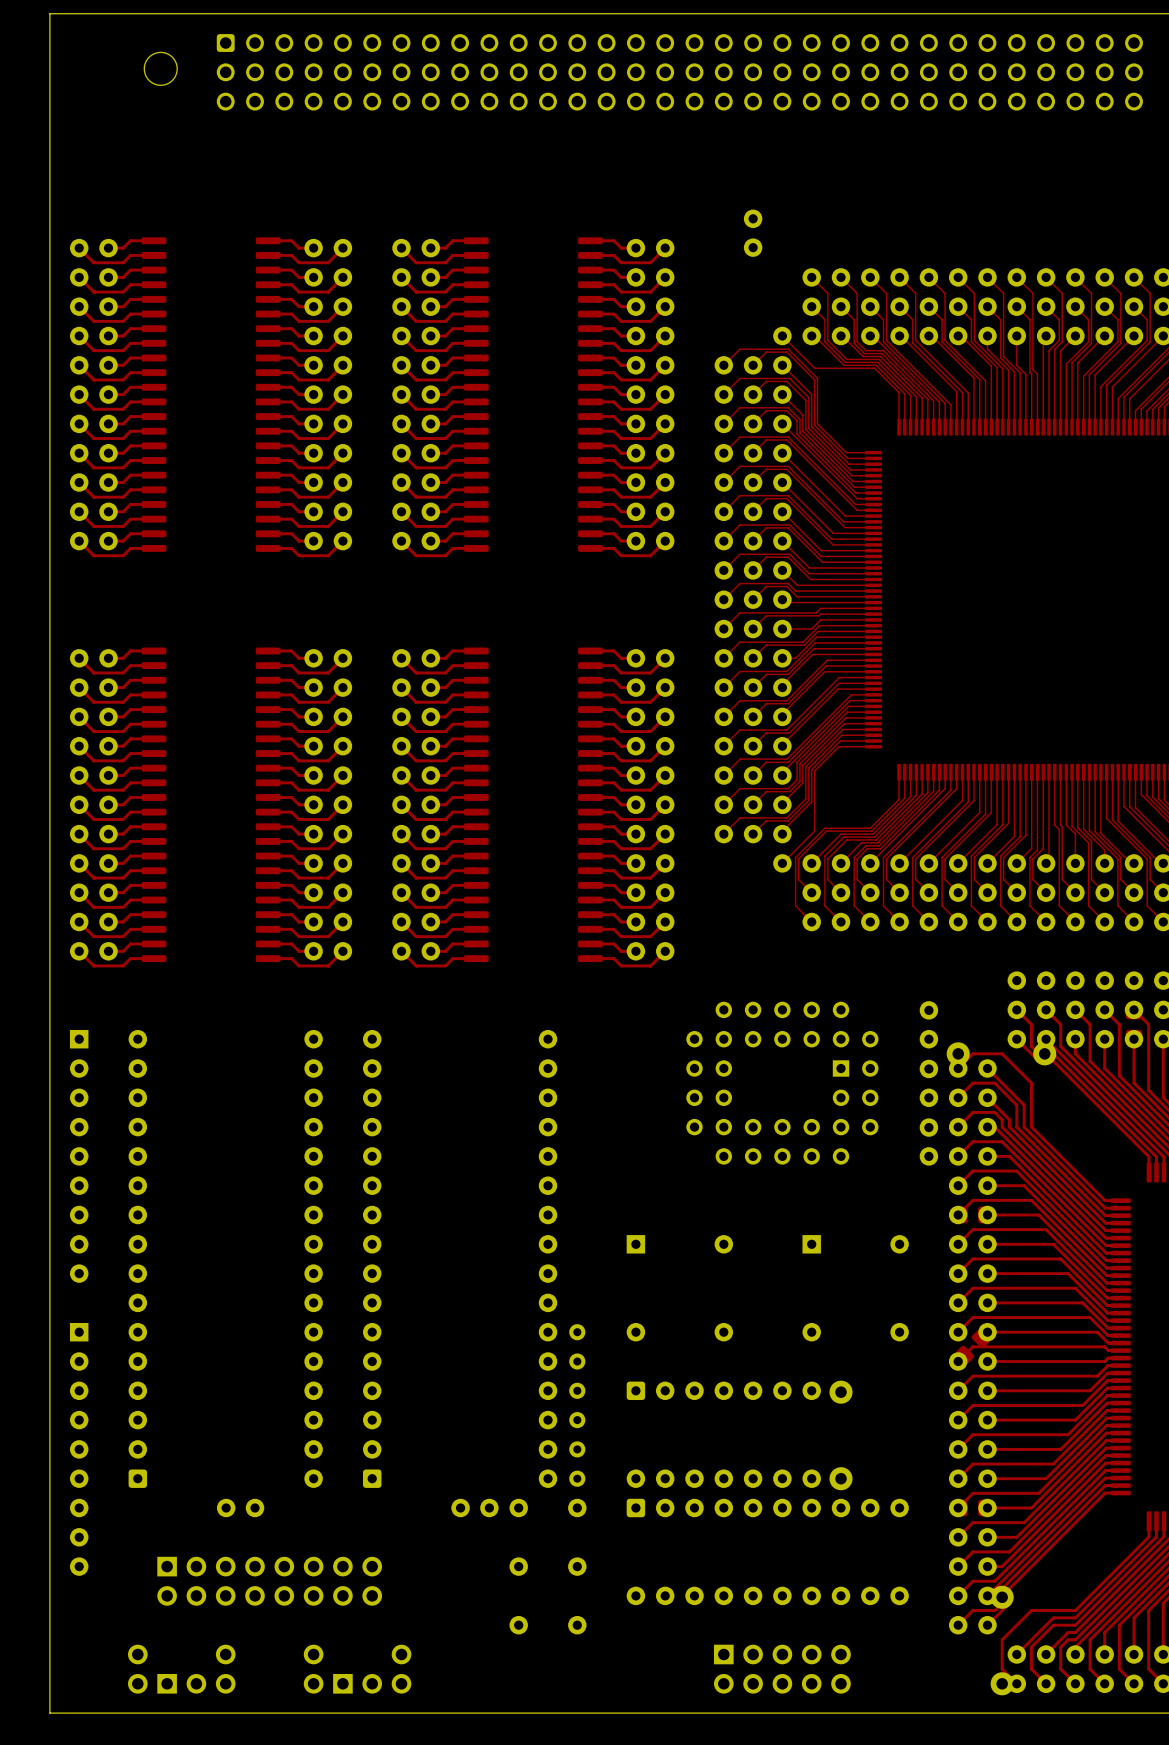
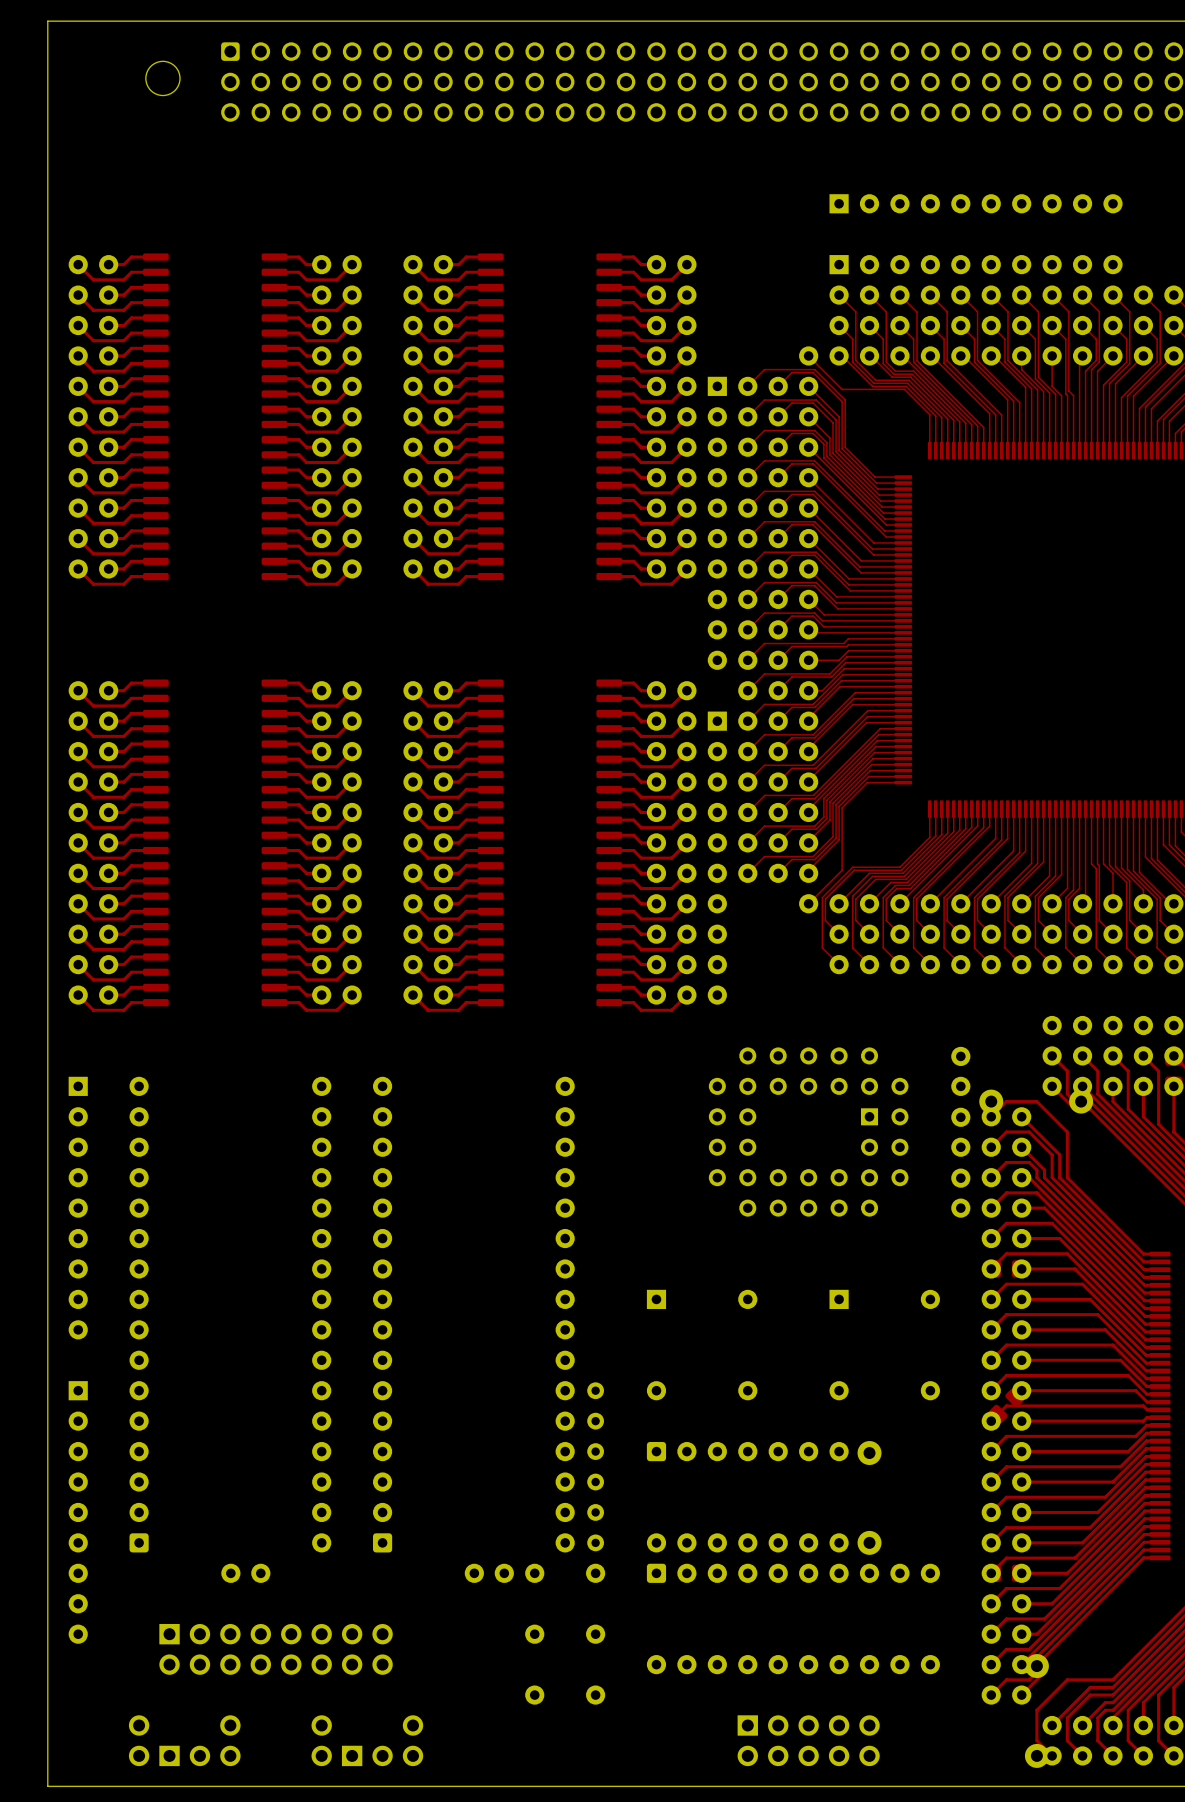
part: none -> (976, 203)
part: (753, 233) -> none
part: none -> (976, 264)
part: none -> (717, 523)
part: none -> (717, 858)

